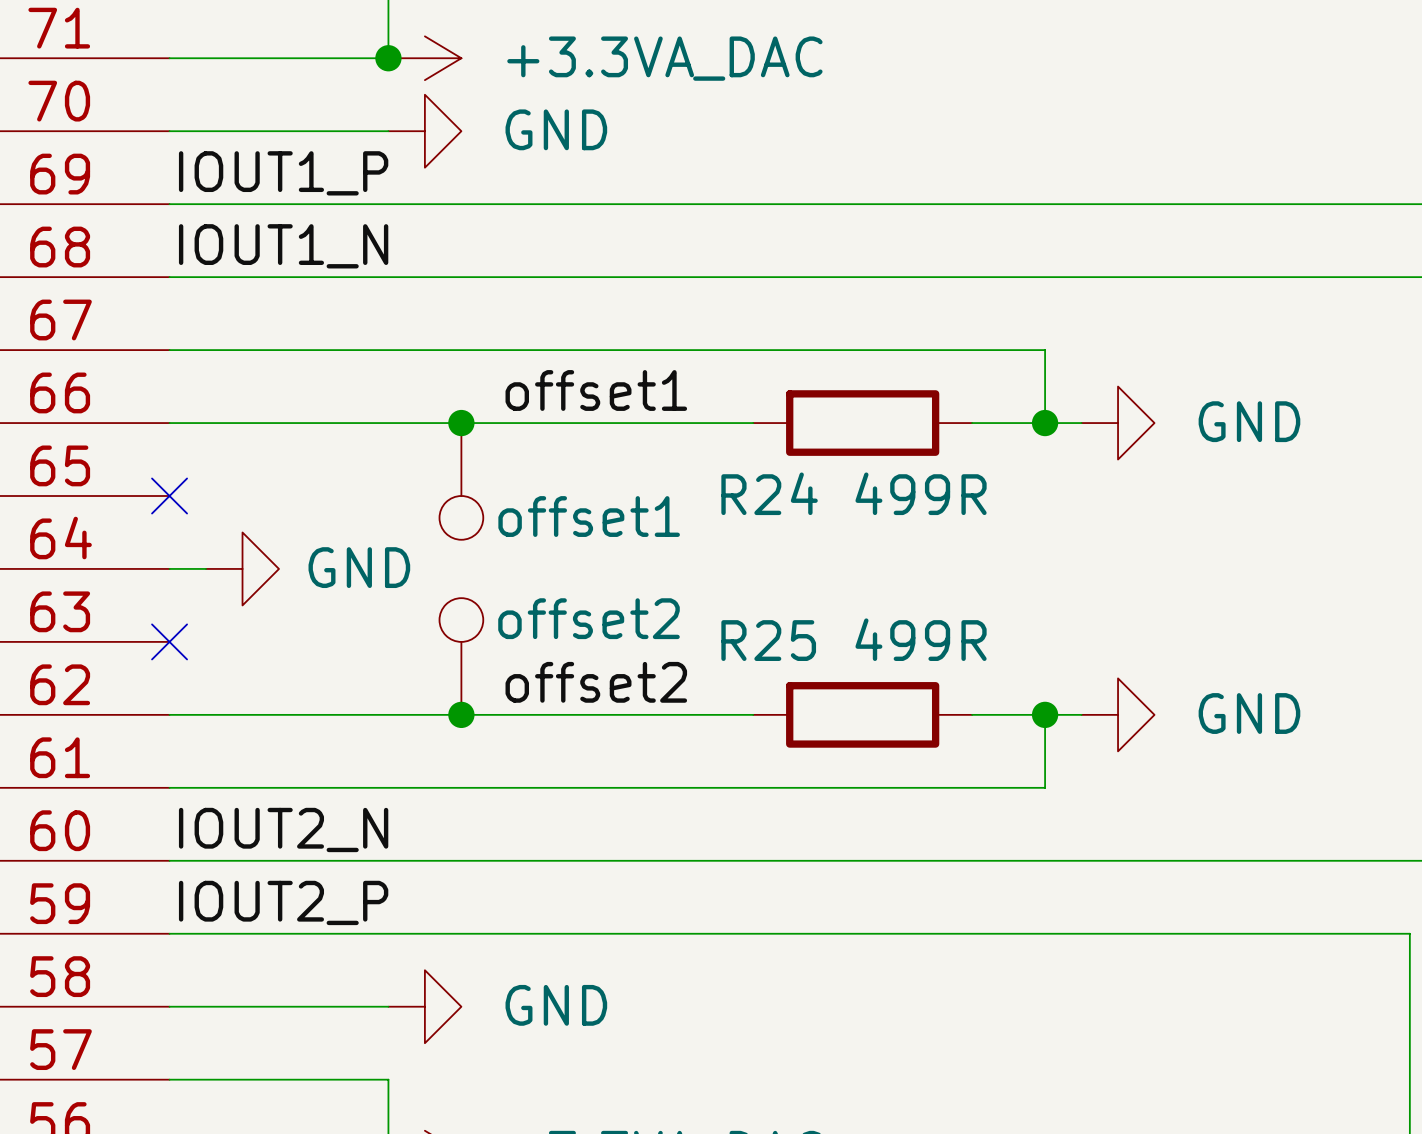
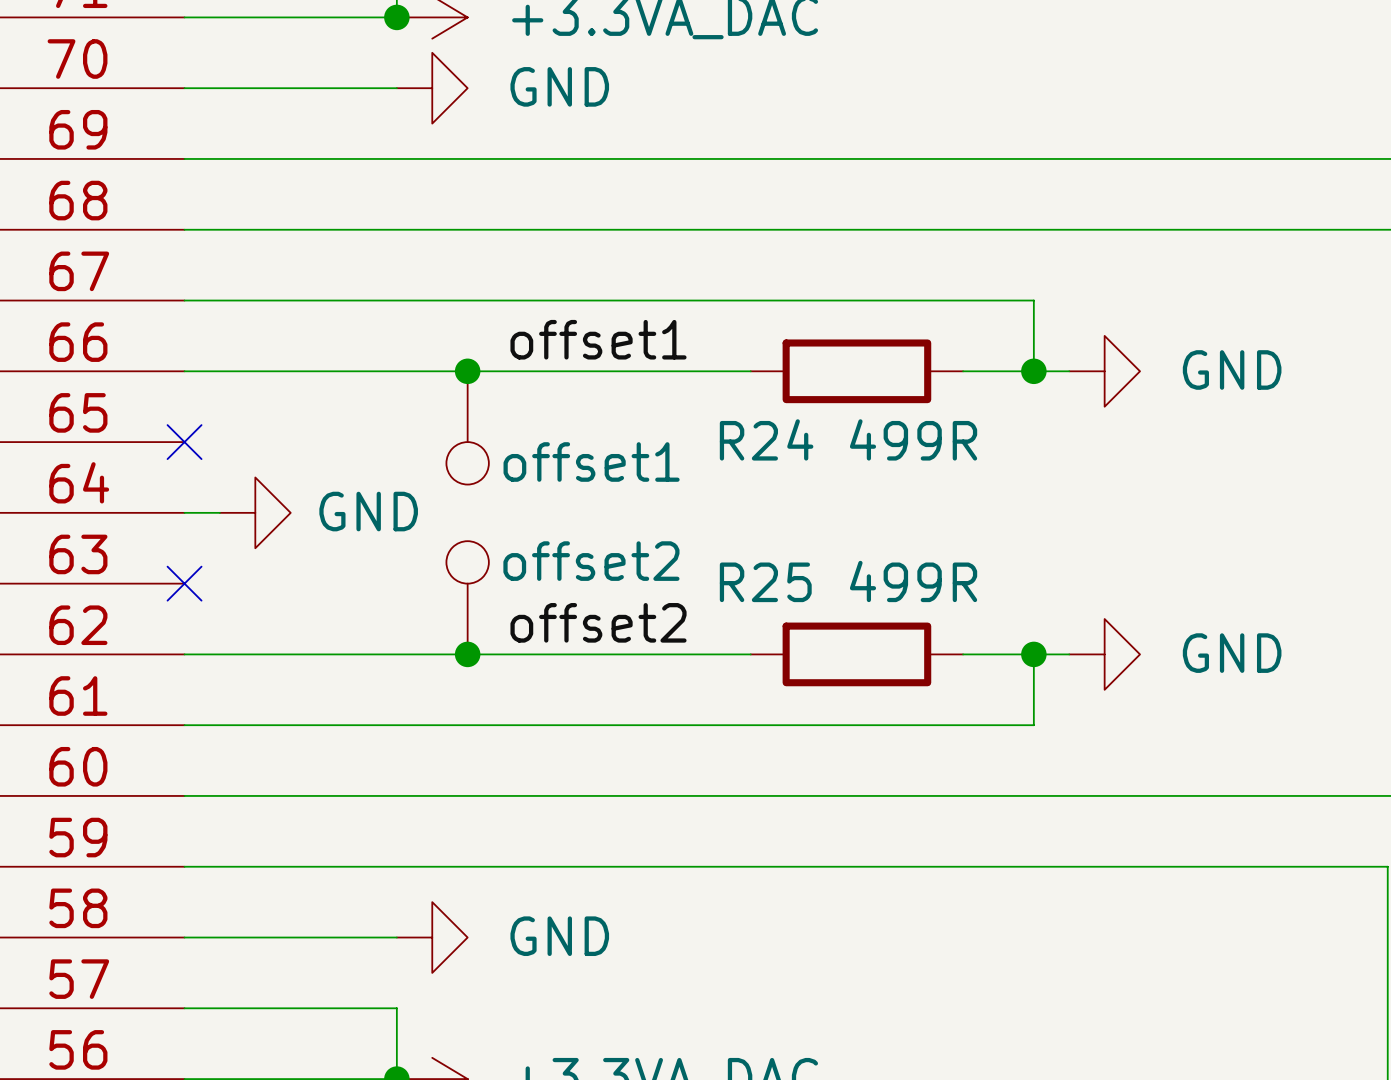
label: IOUT1_P (283, 173) -> none
label: IOUT1_N (283, 246) -> none
label: IOUT2_N (283, 829) -> none
label: IOUT2_P (283, 902) -> none

